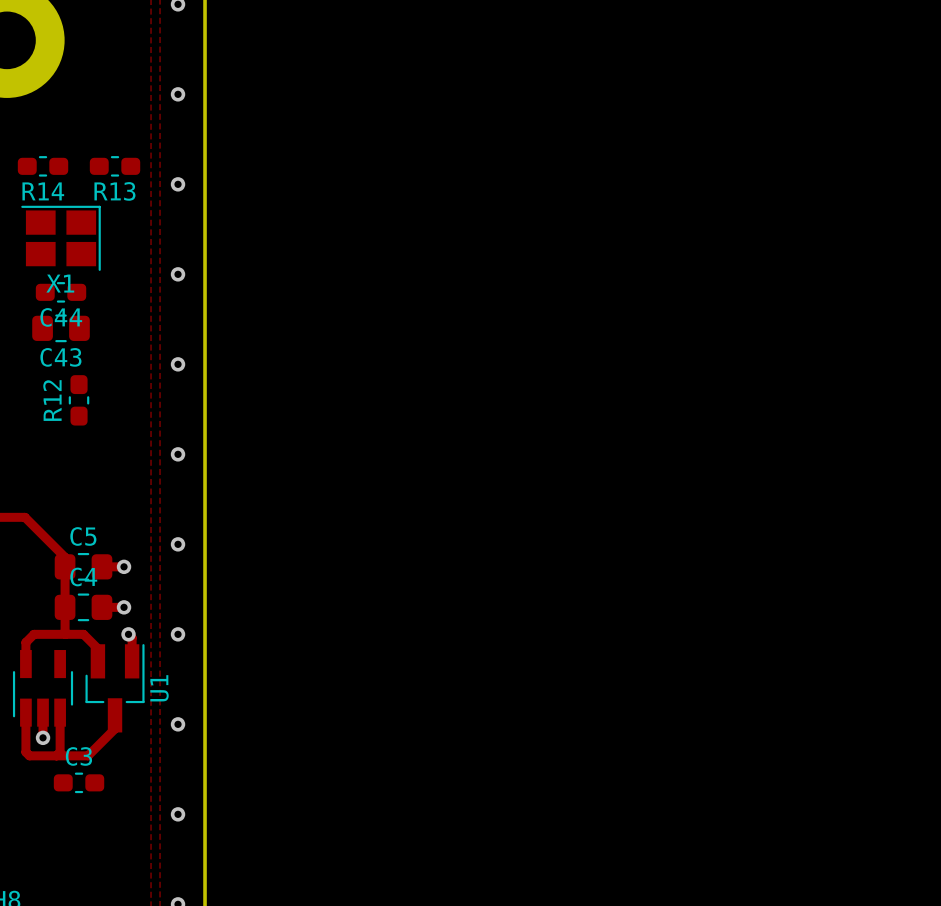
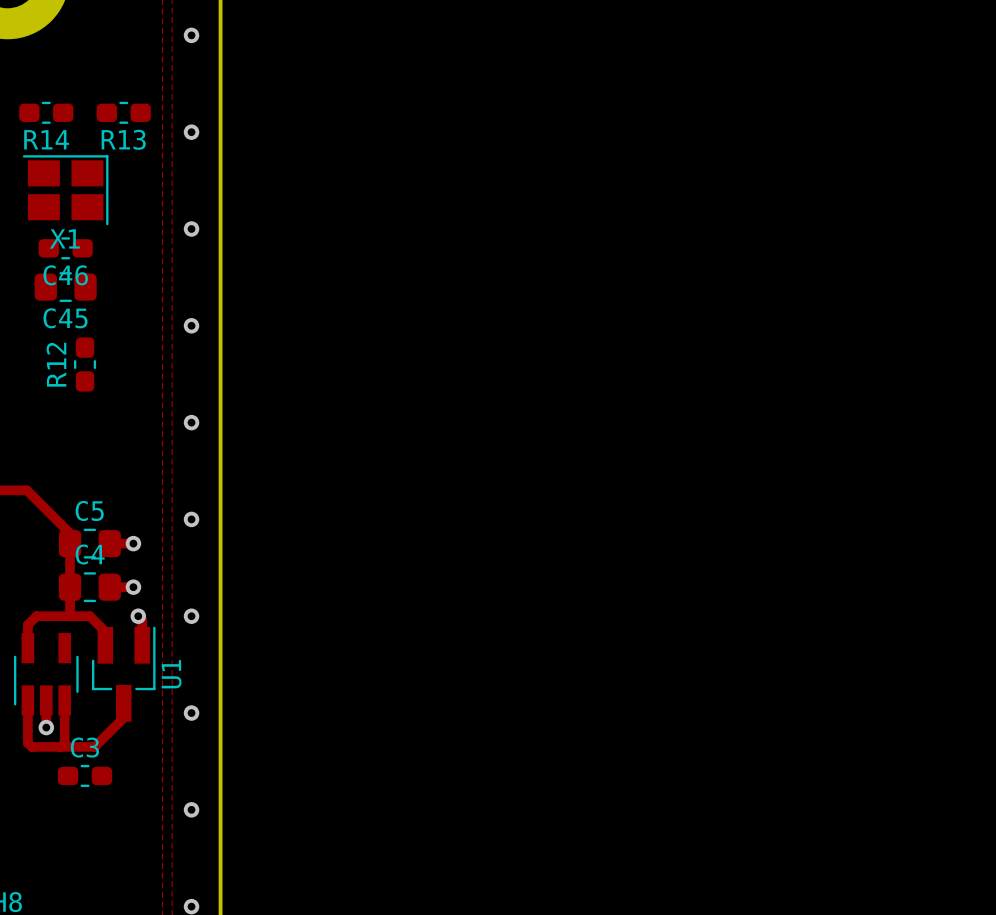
C44 name: C44 (61, 317) -> C46 (65, 275)
C43 name: C43 (60, 357) -> C45 (65, 318)

